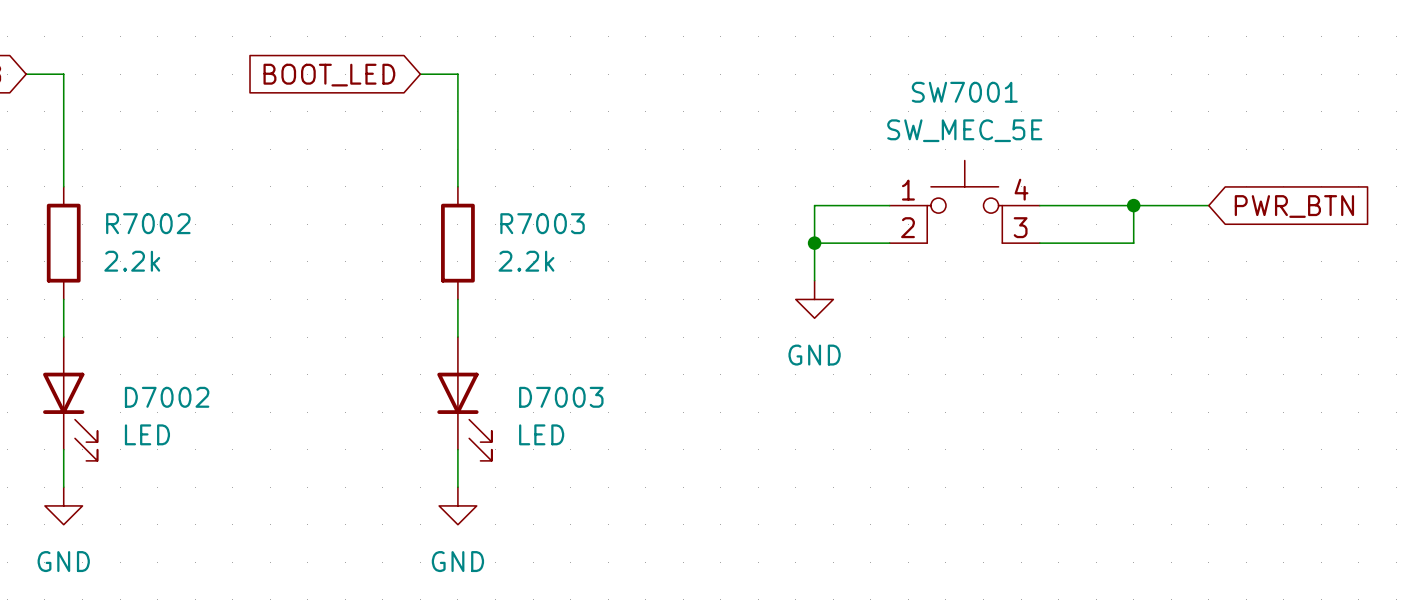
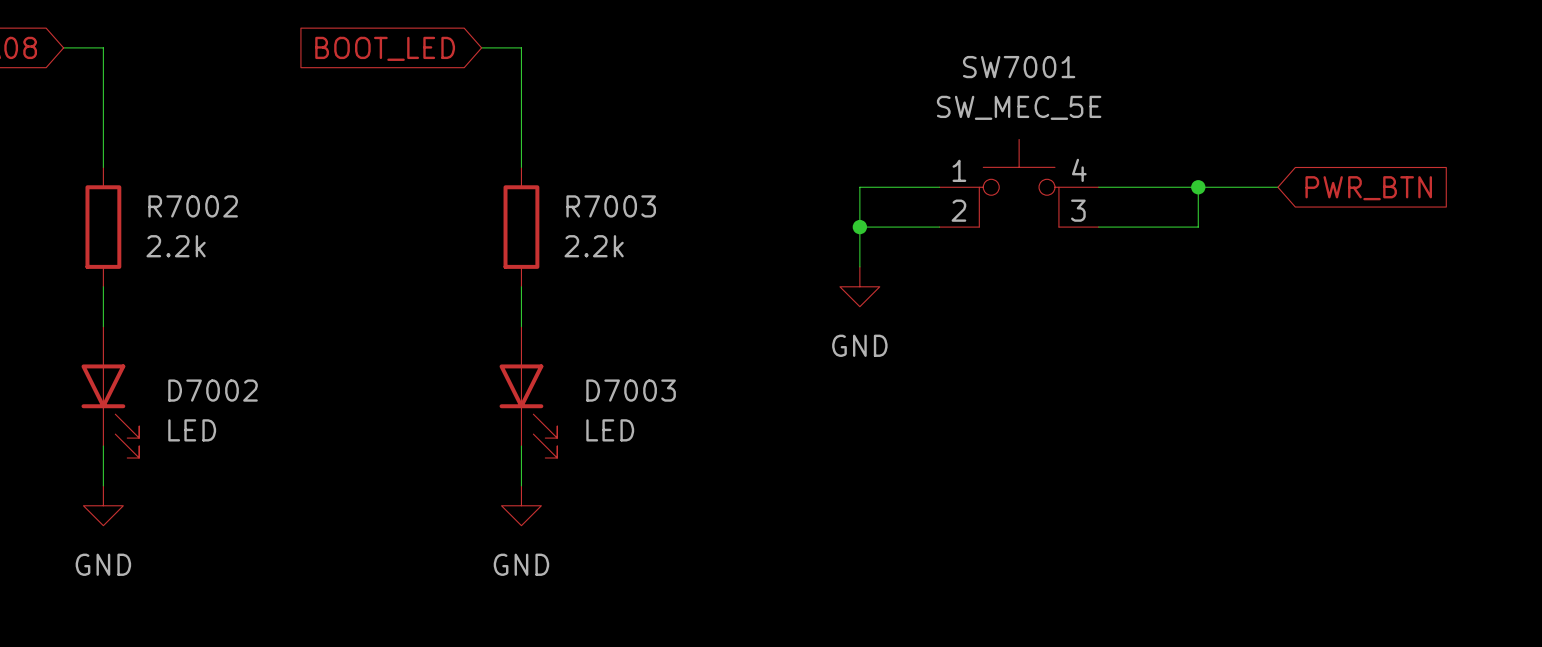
SW7001 position: (964, 201) -> (1019, 183)
wire: (814, 205) (814, 280) -> (899, 187) (859, 187) (859, 266)
wire: (1133, 205) (1133, 243) (1096, 243) -> (1198, 187) (1198, 227)
junction position: (1133, 205) -> (1198, 187)
wire: (1171, 205) (1208, 205) -> none
global label position: PWR_BTN (1294, 206) -> PWR_BTN (1368, 188)
wire: none -> (859, 227) (899, 227)
junction position: (814, 243) -> (859, 227)
power symbol position: GND (814, 299) -> GND (859, 286)

